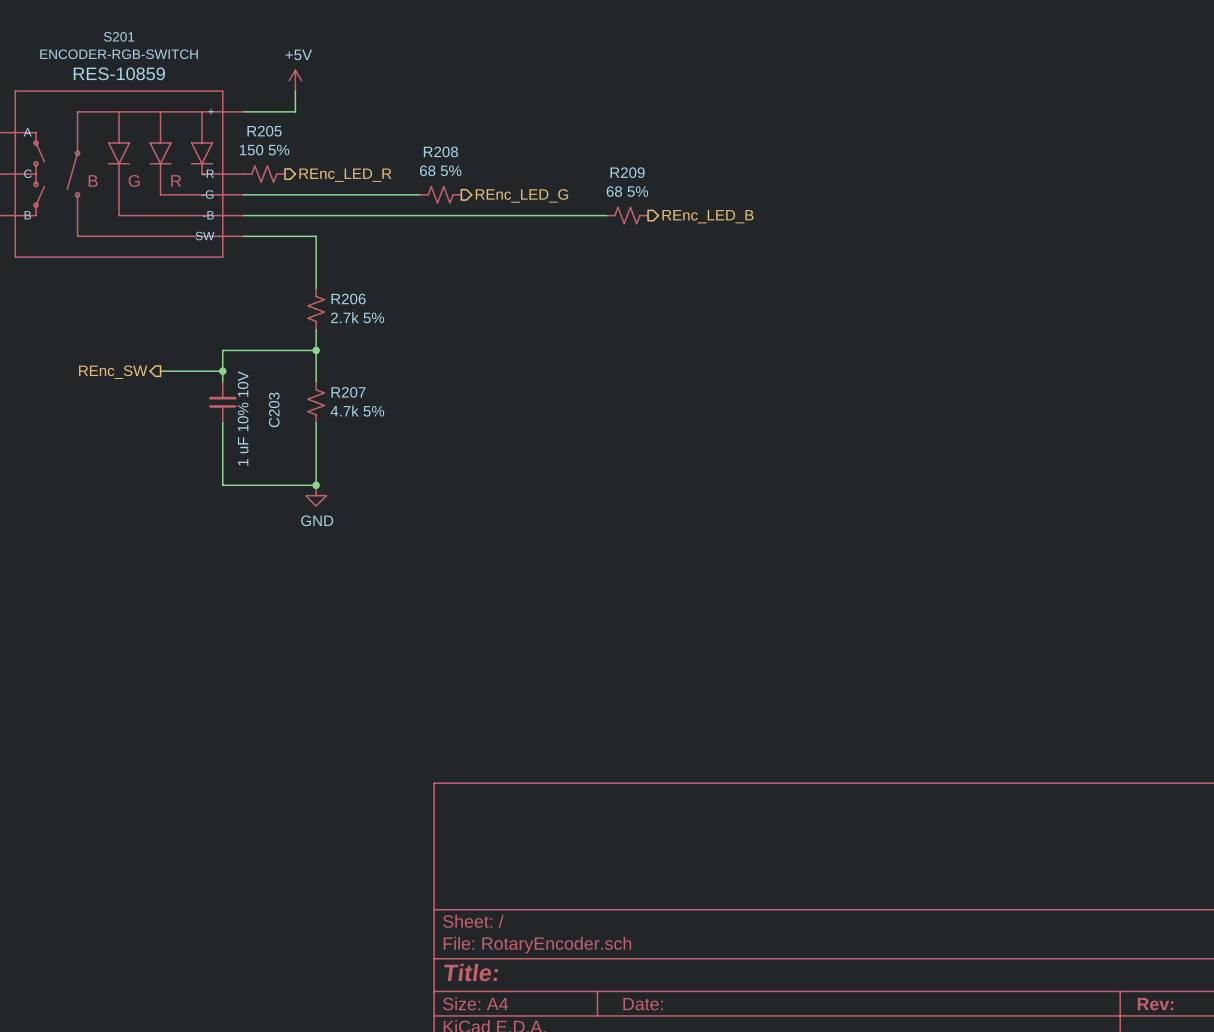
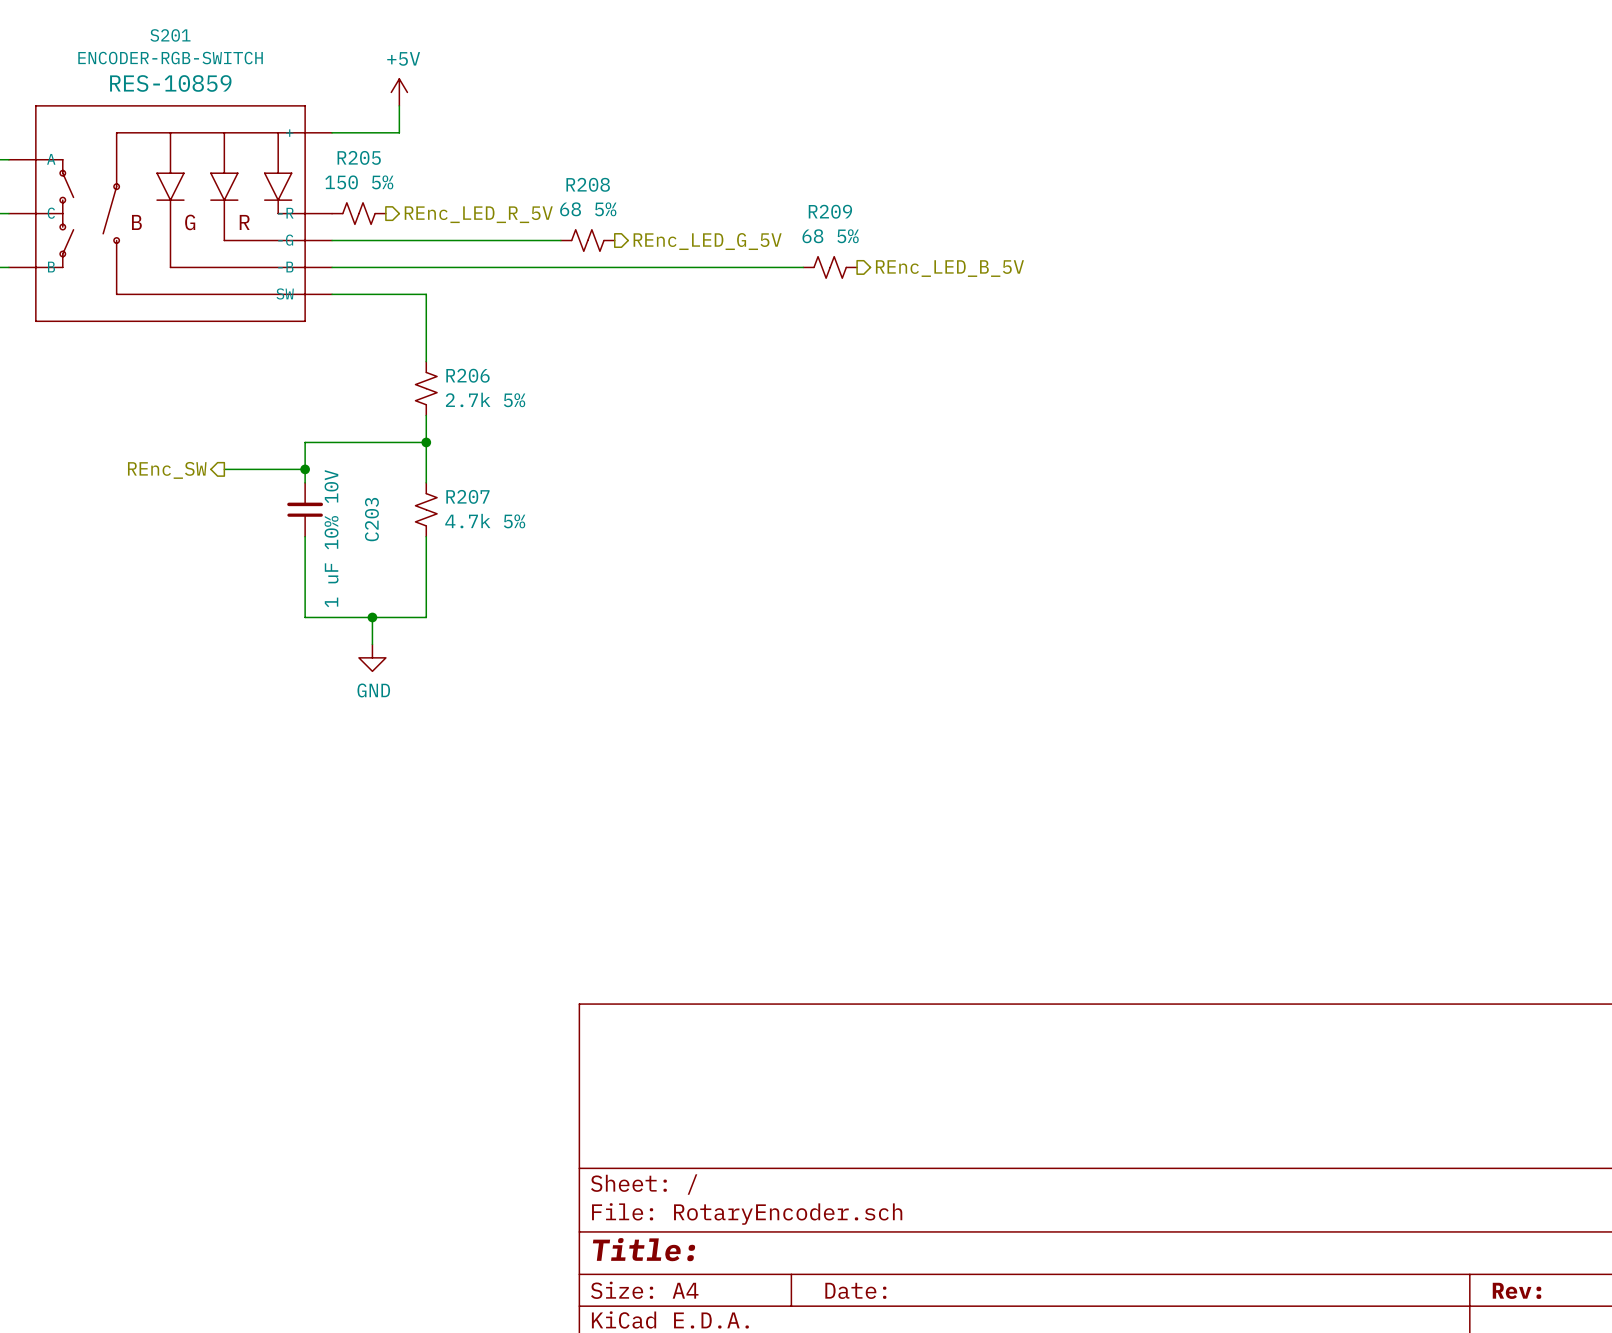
hierarchical label: REnc_LED_R (345, 175) -> REnc_LED_R_5V (478, 214)
hierarchical label: REnc_LED_G (521, 195) -> REnc_LED_G_5V (707, 241)
hierarchical label: REnc_LED_B (707, 216) -> REnc_LED_B_5V (949, 268)
wire: none -> (372, 617) (372, 644)
junction position: (316, 485) -> (372, 617)
power symbol position: GND (316, 495) -> GND (372, 657)

